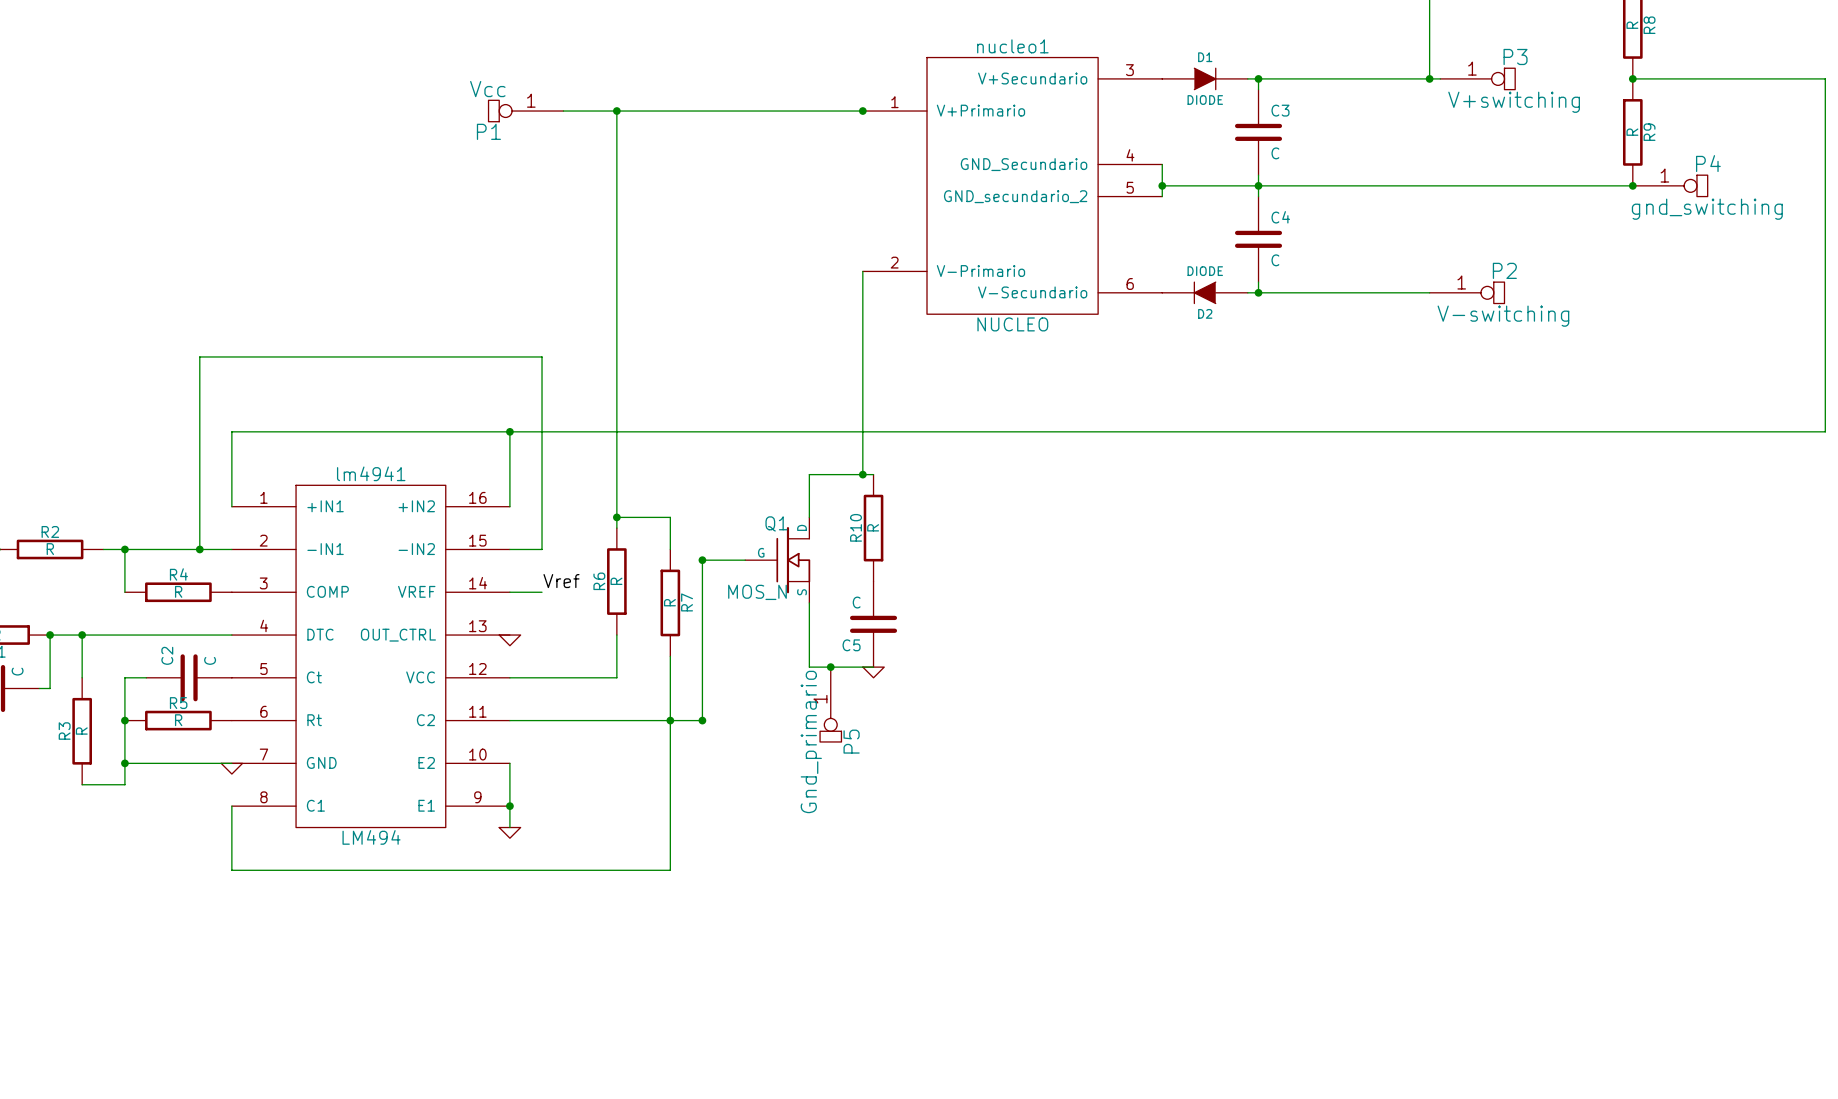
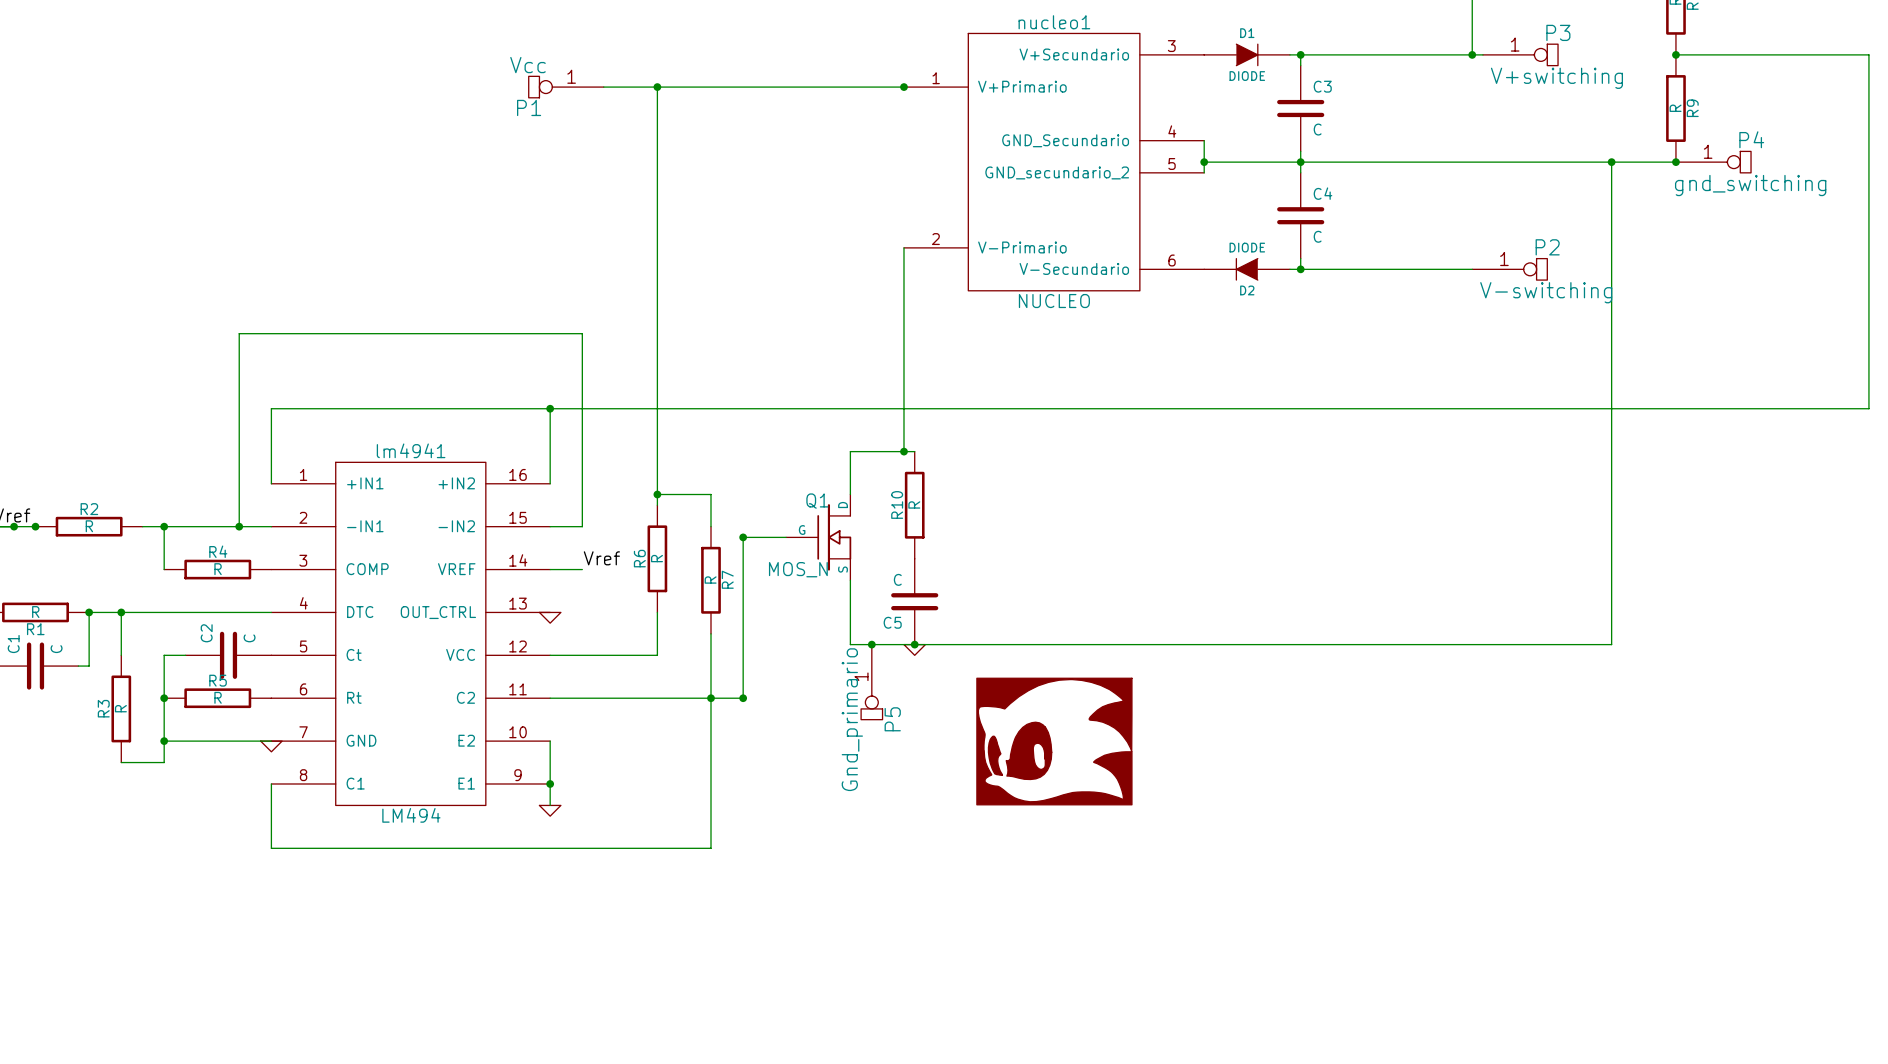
wire: none -> (1611, 162) (1611, 644) (914, 644)
junction: none -> (1611, 162)
junction: none -> (914, 644)
power symbol: none -> (1054, 741)

